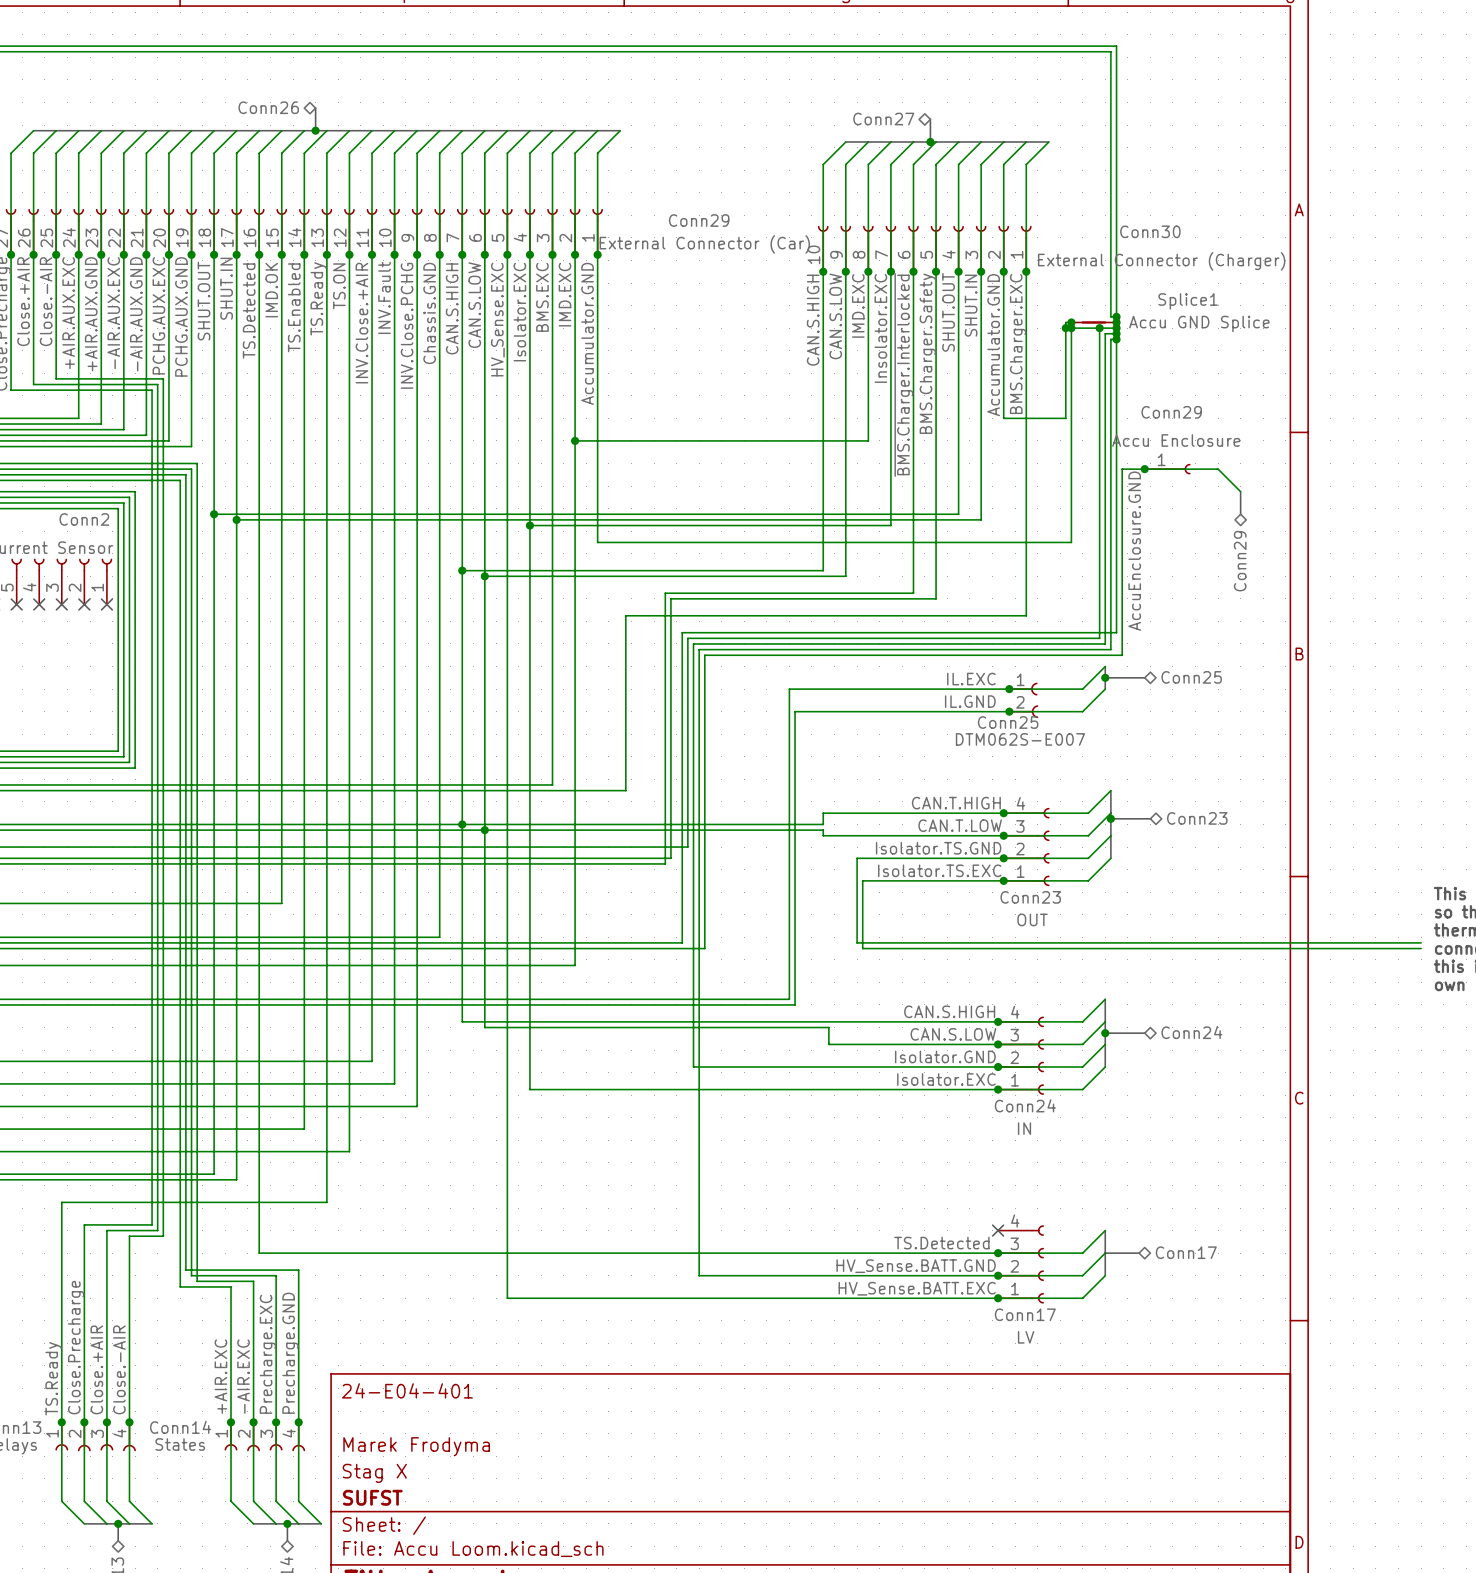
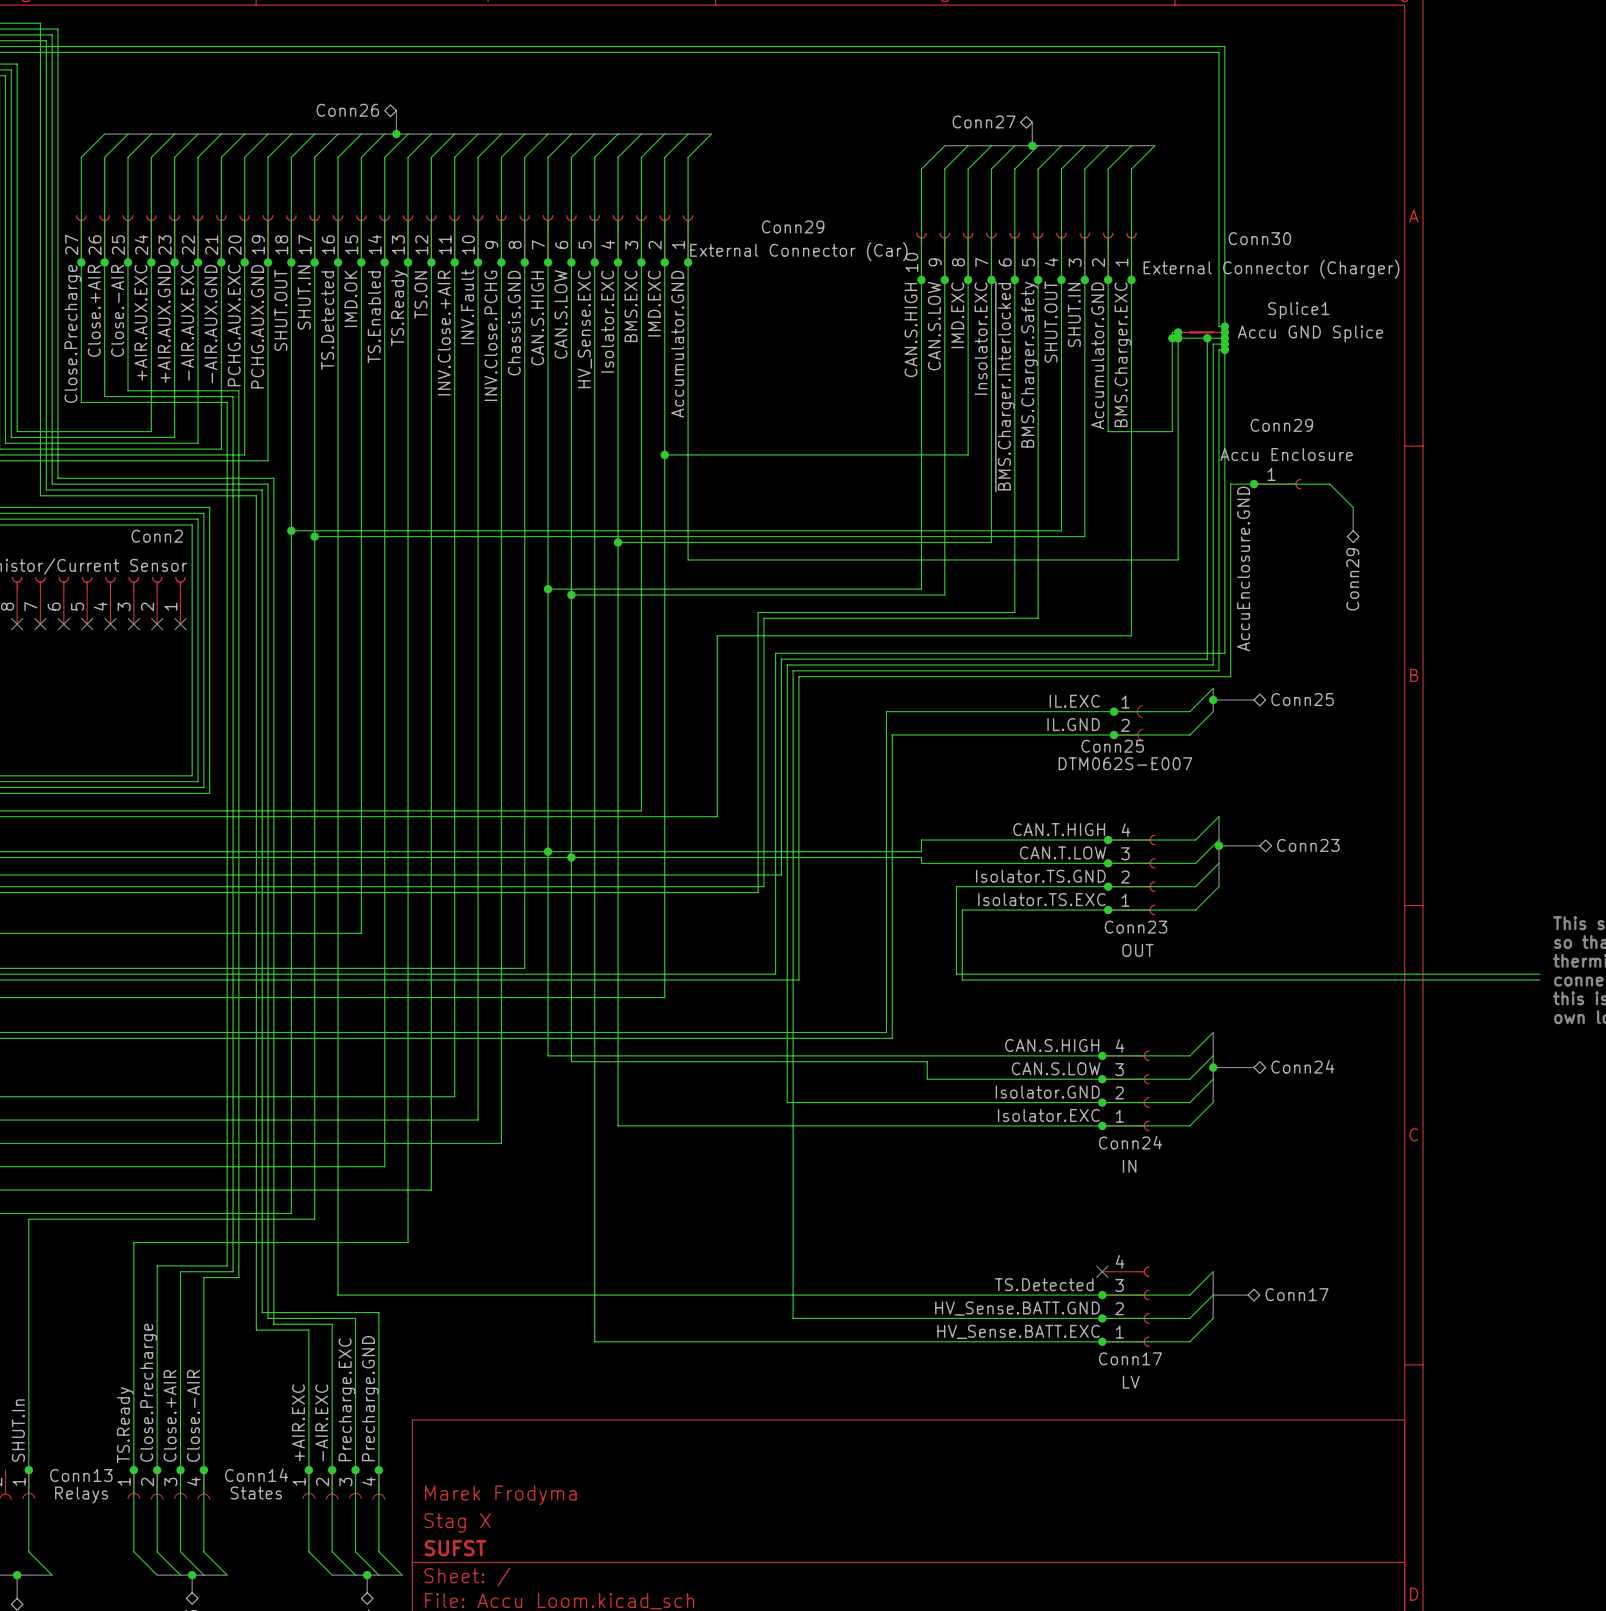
title block: 24-E04-401 (407, 1390) -> none

